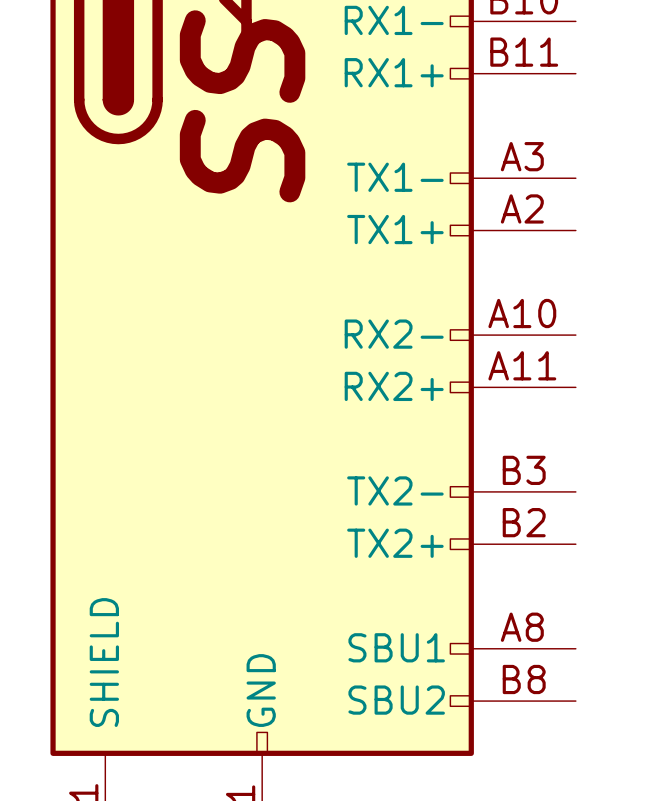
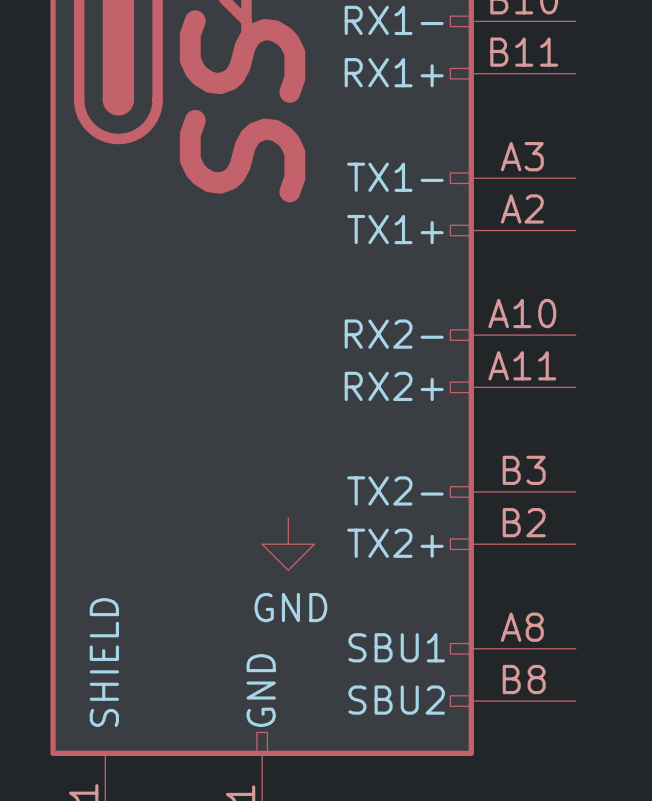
power symbol: none -> GND (288, 544)

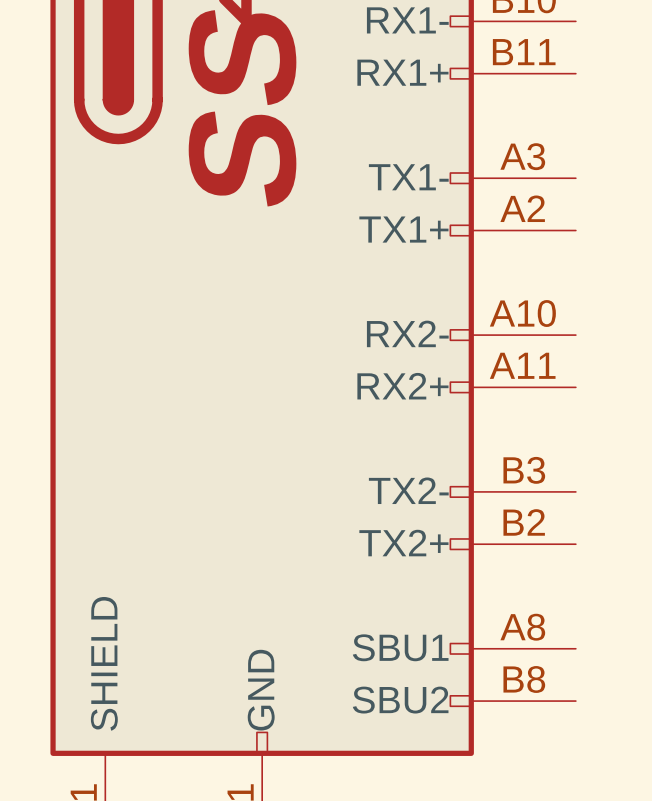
power symbol: GND (288, 544) -> none

